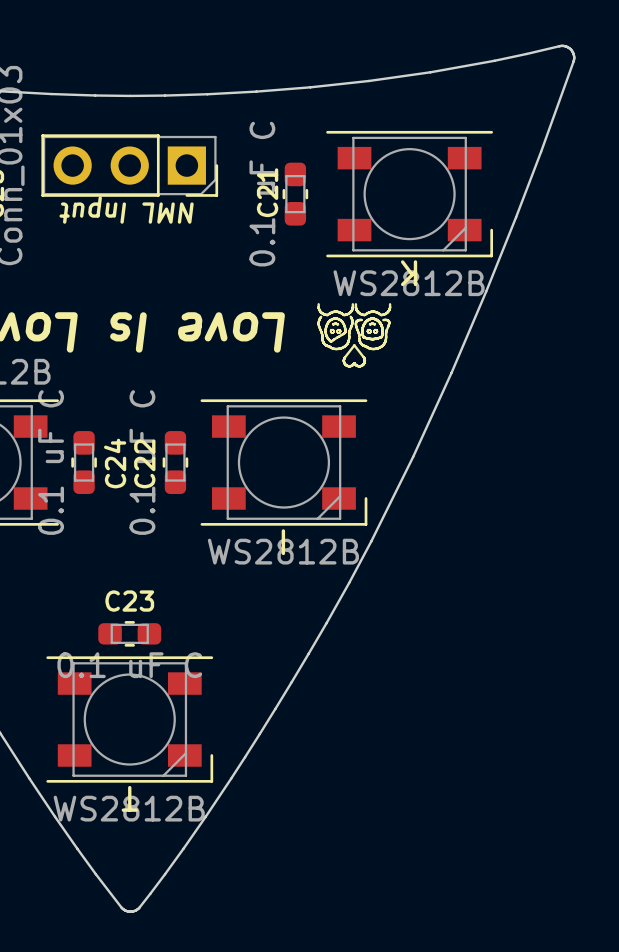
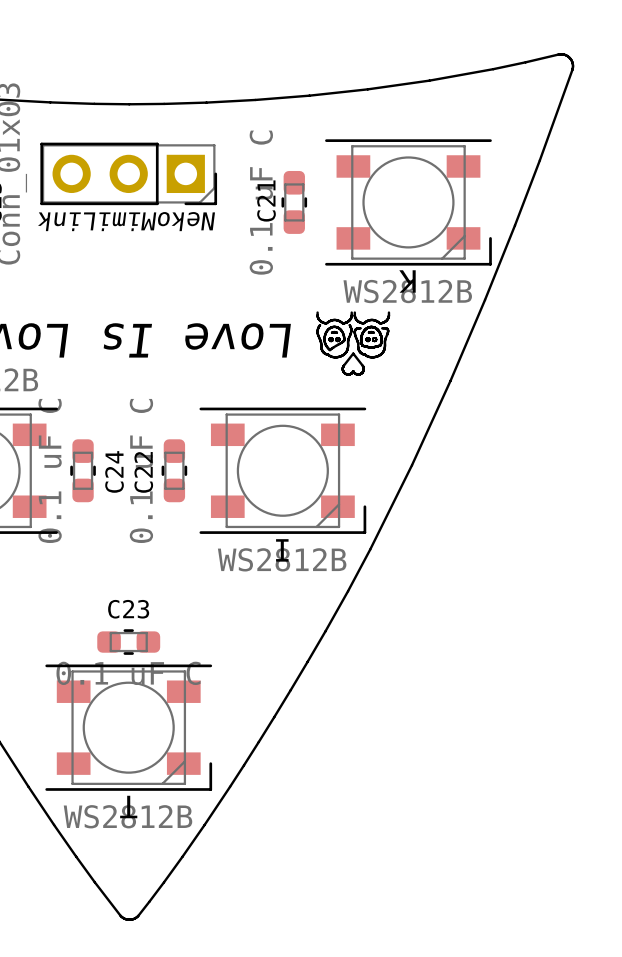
NML Input name: NML Input (126, 210) -> NekoMimiLink (126, 221)

